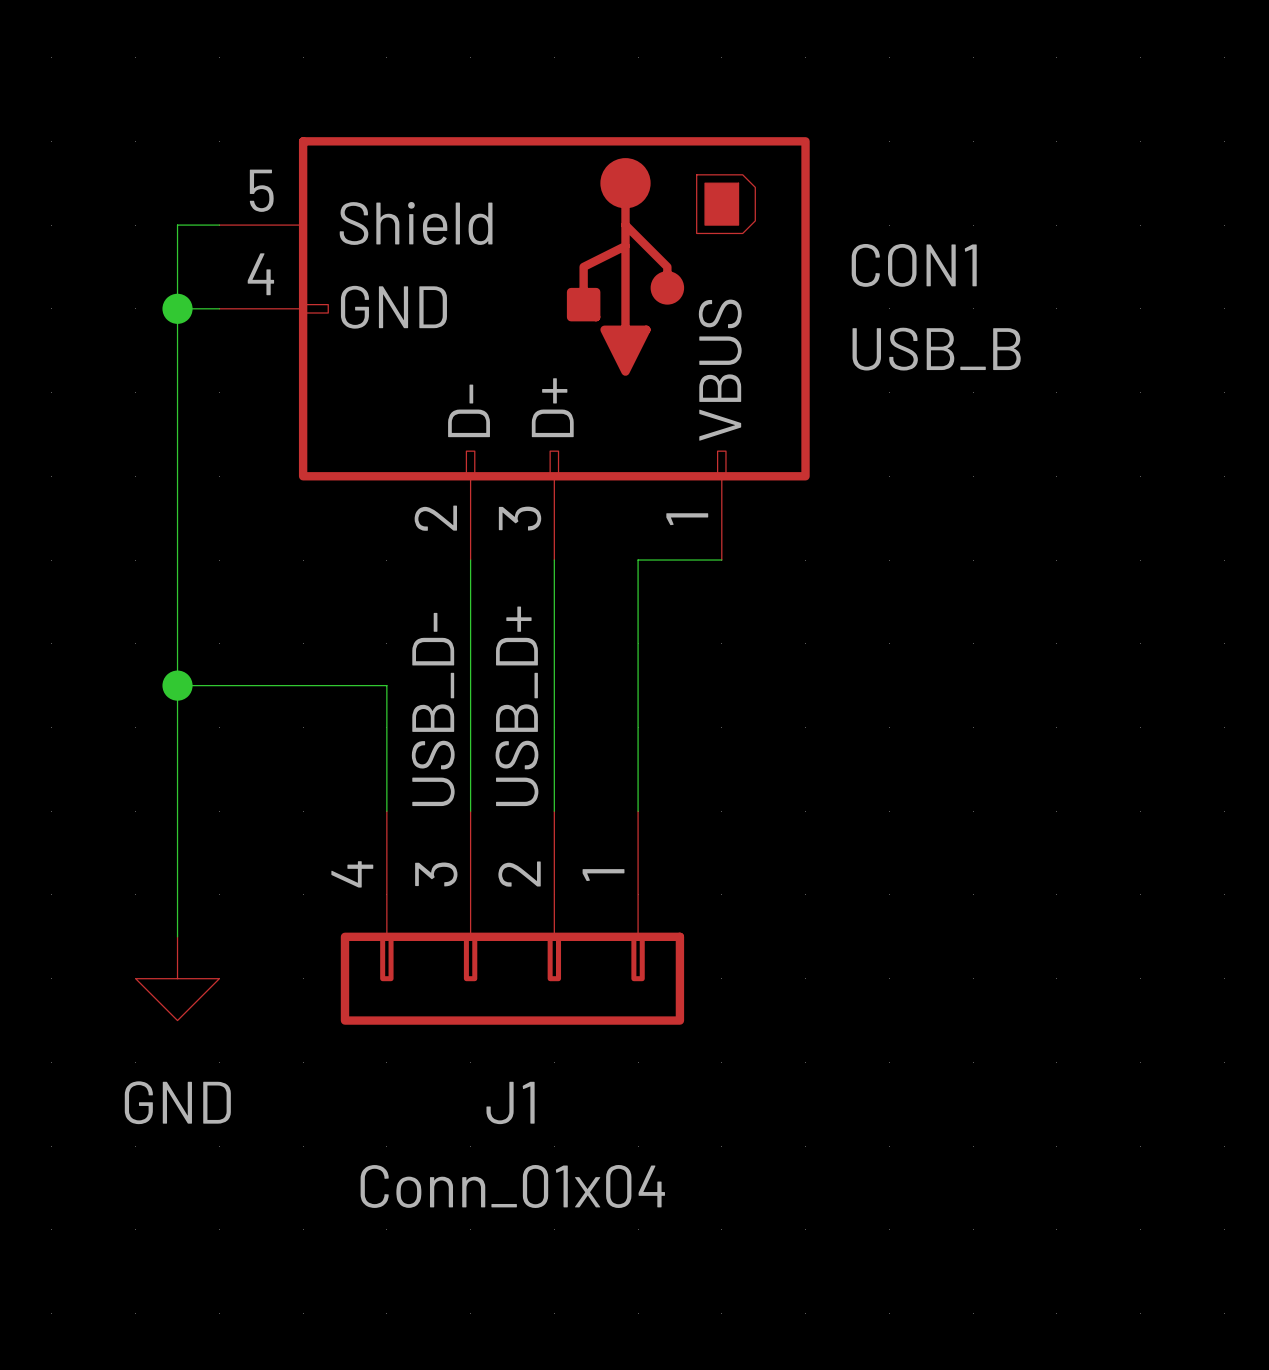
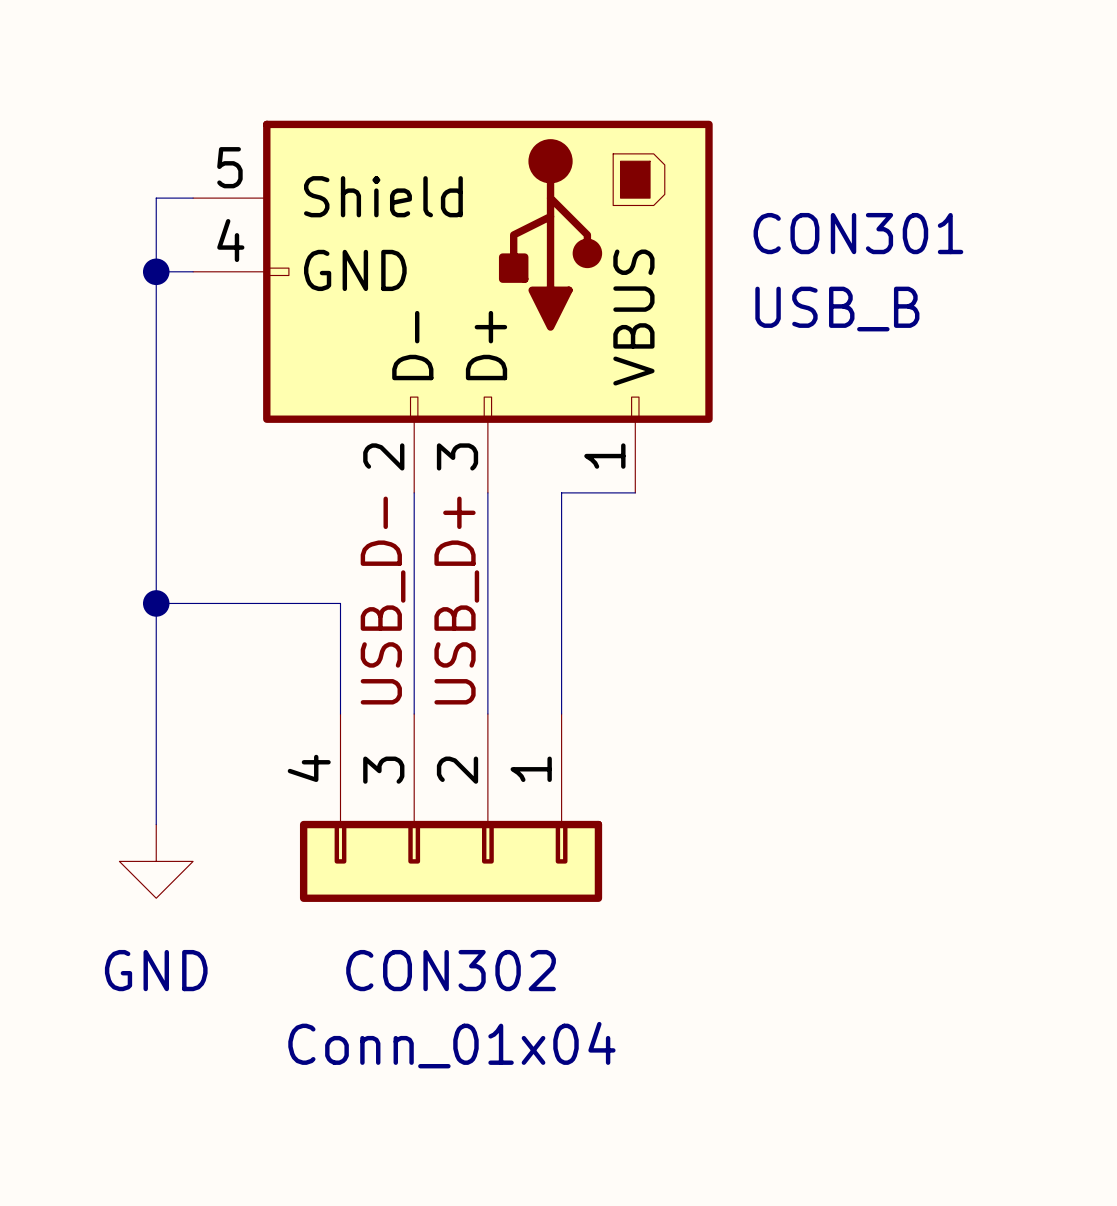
CON1 name: CON1 (914, 265) -> CON301 (858, 233)
J1 name: J1 (510, 1102) -> CON302 (451, 970)

